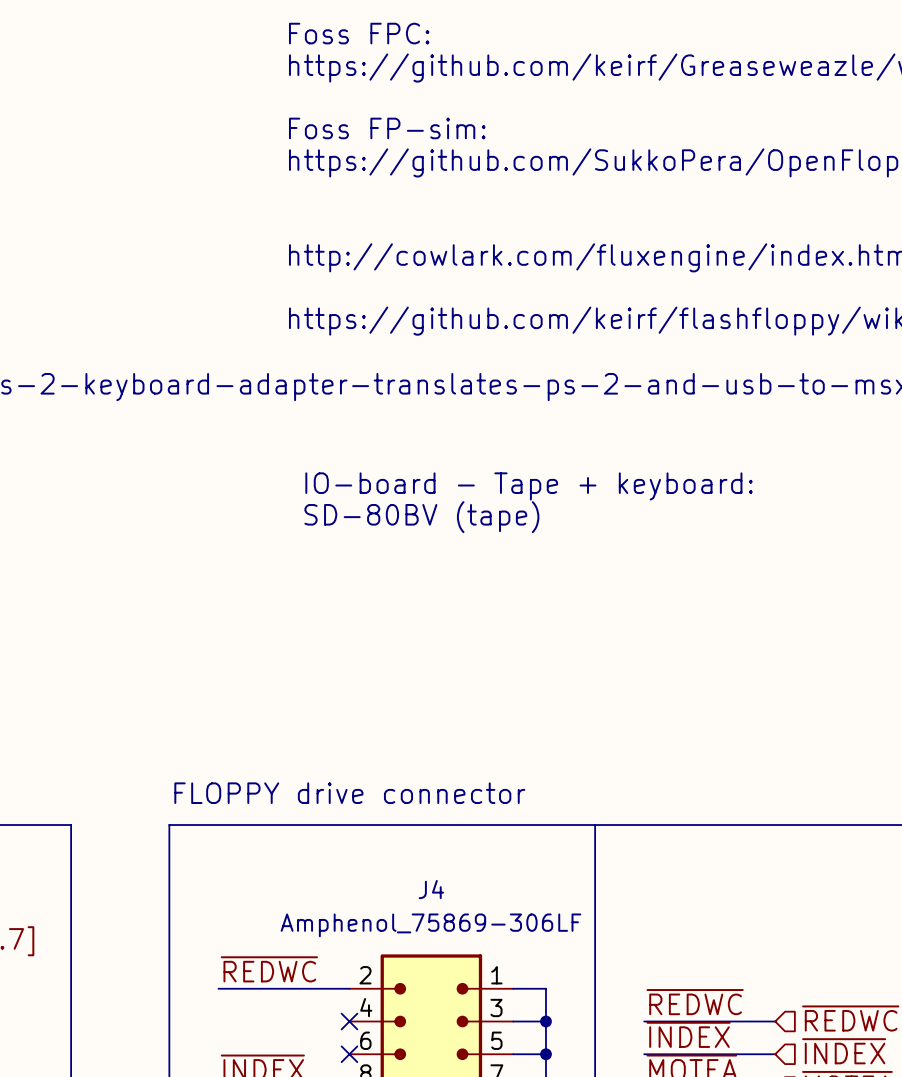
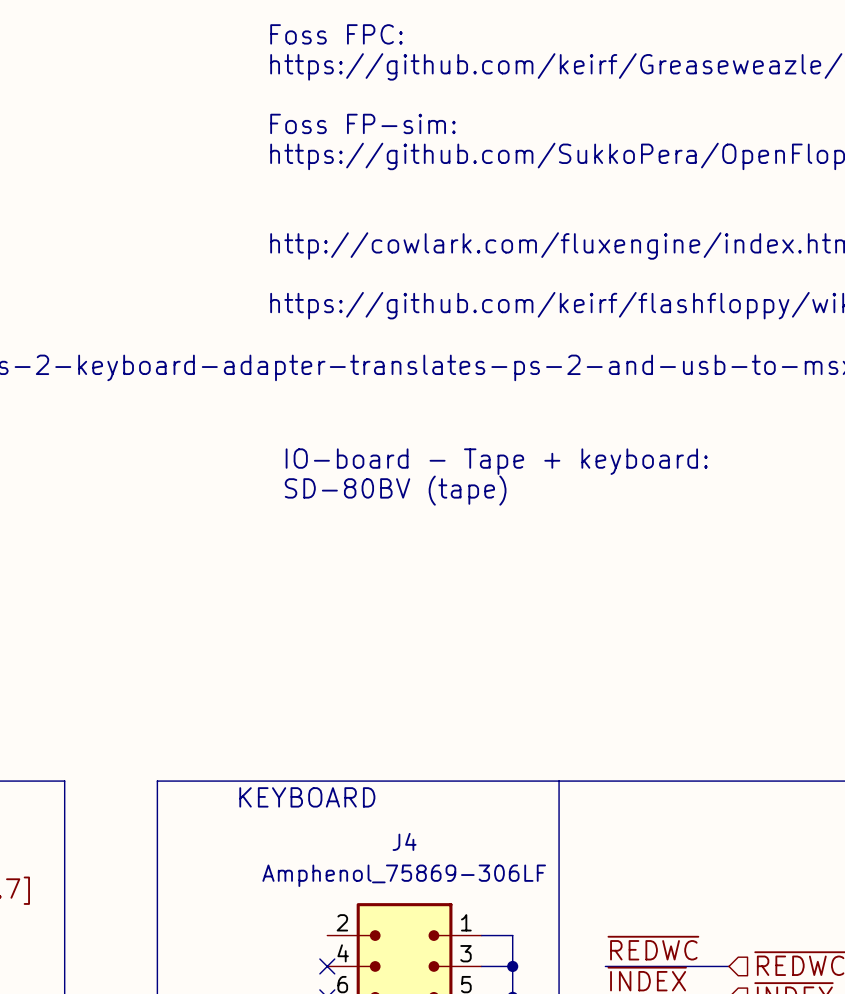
text: FLOPPY drive connector (349, 793) -> none
text: none -> KEYBOARD (307, 797)
label: ~{REDWC} (269, 969) -> none
wire: (218, 988) (349, 988) -> none

